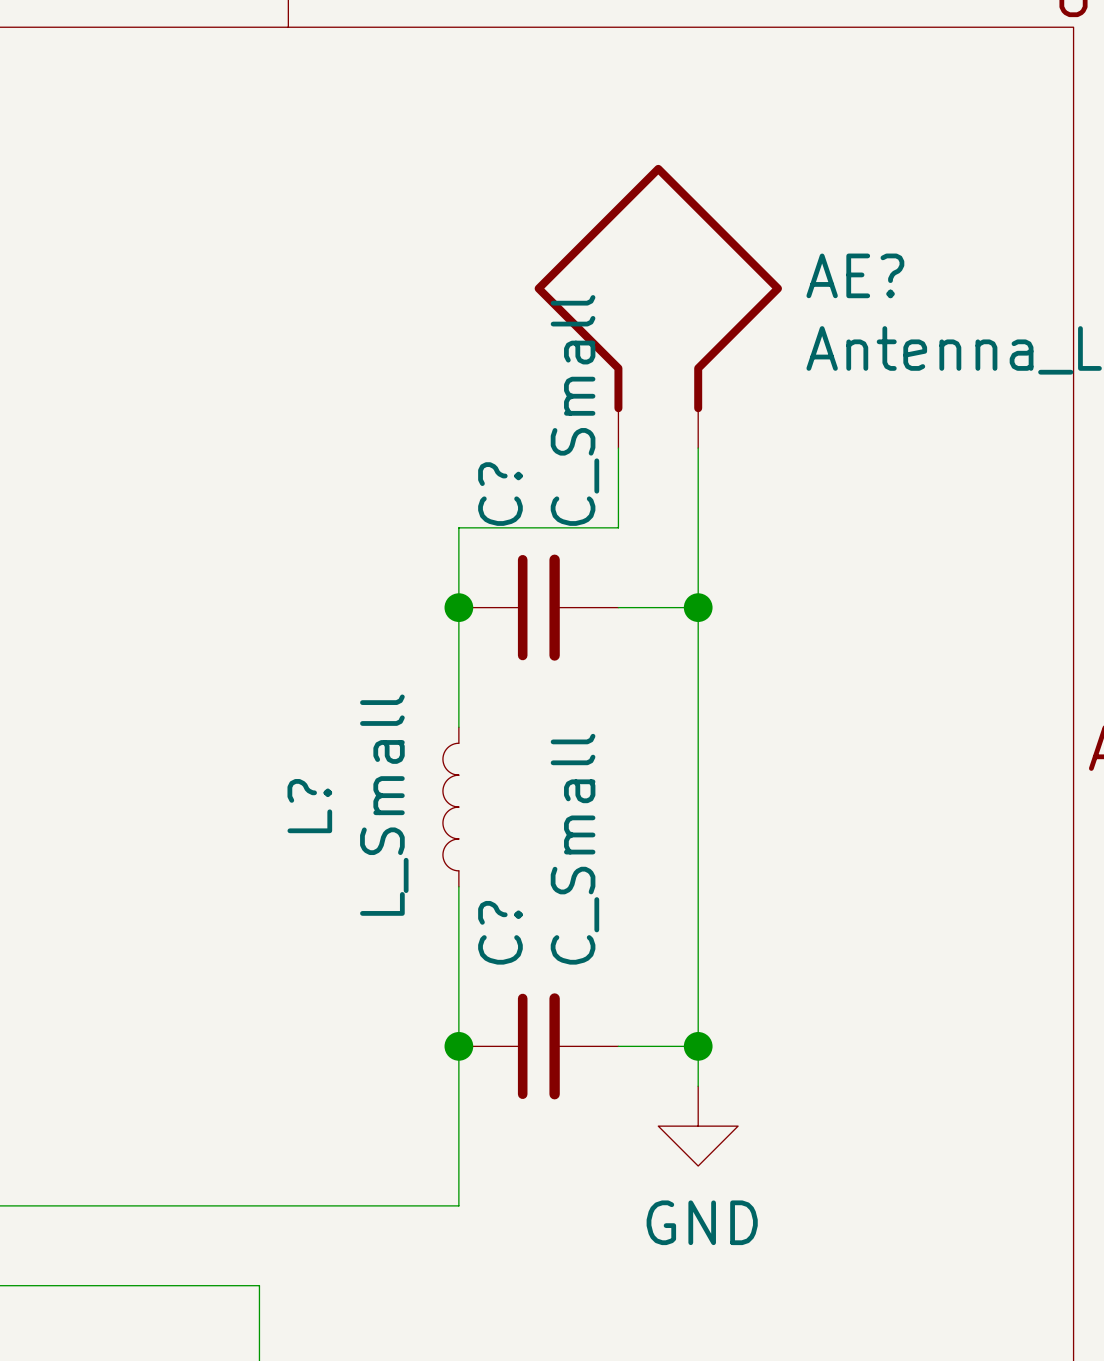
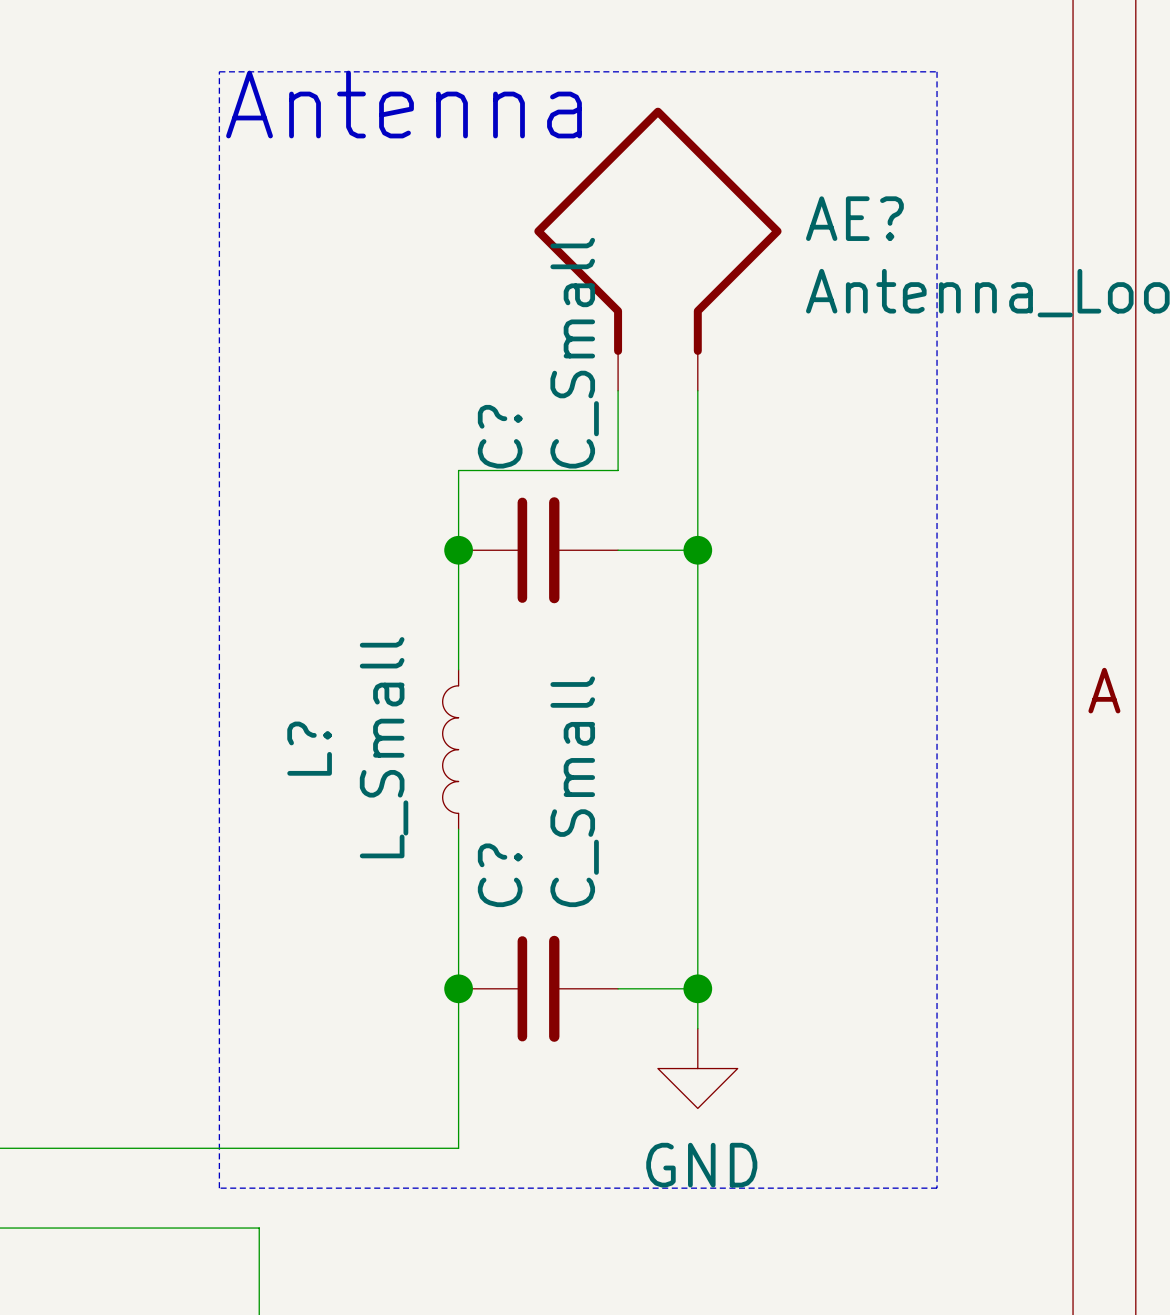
line: none -> (219, 71) (937, 71) (937, 1188) (219, 1188) (219, 71)
text: none -> Antenna (404, 104)

